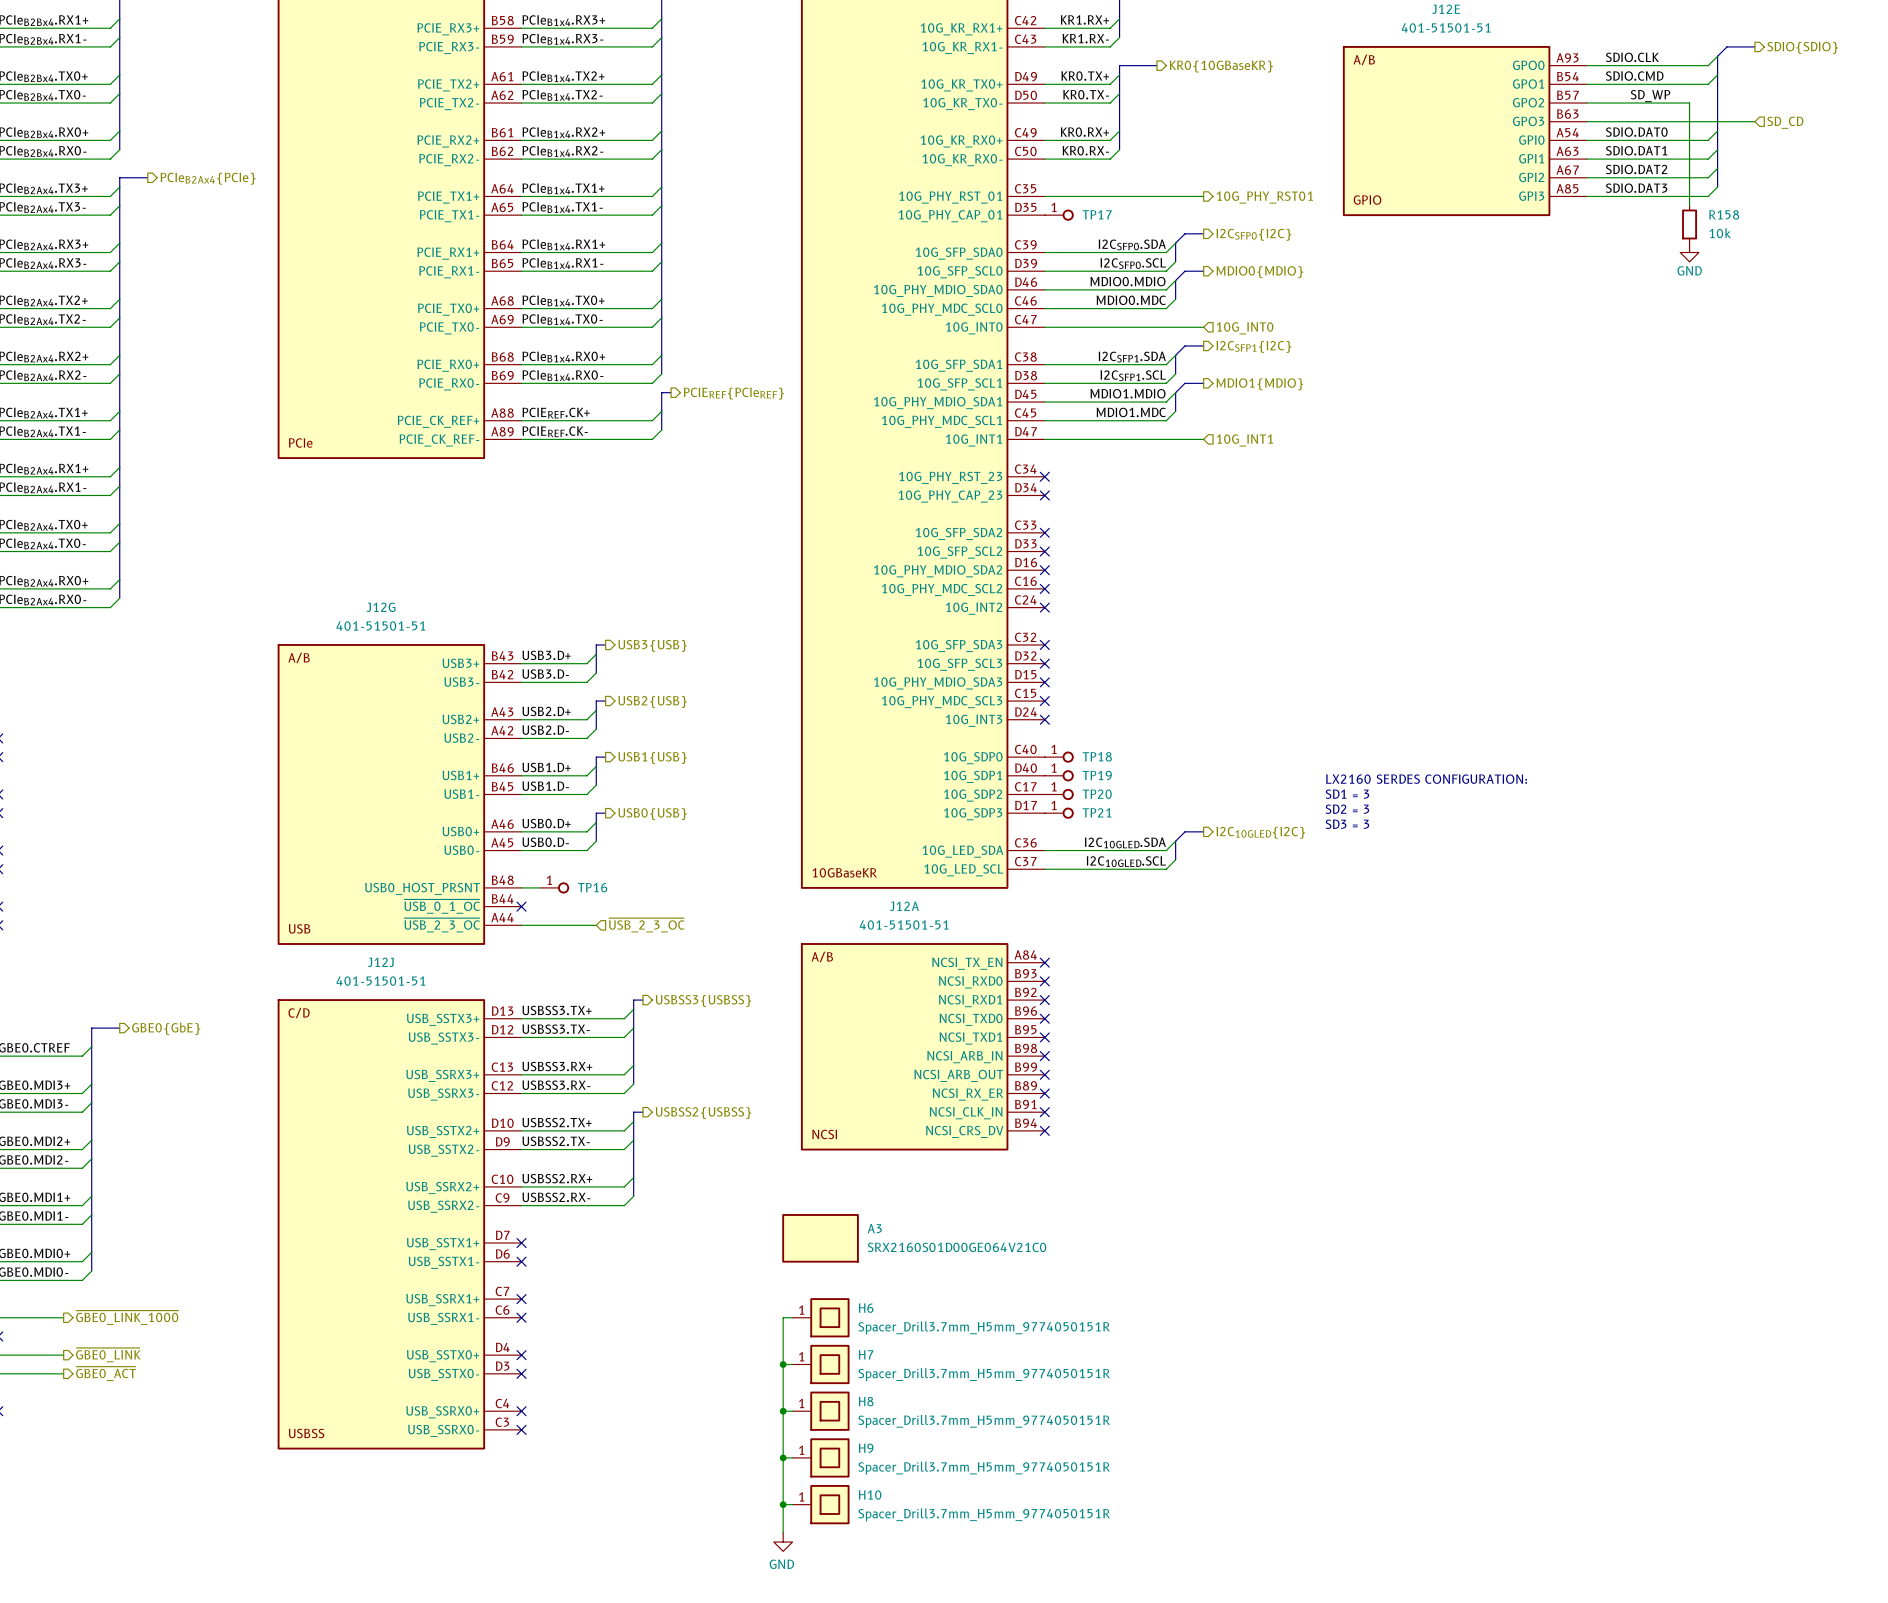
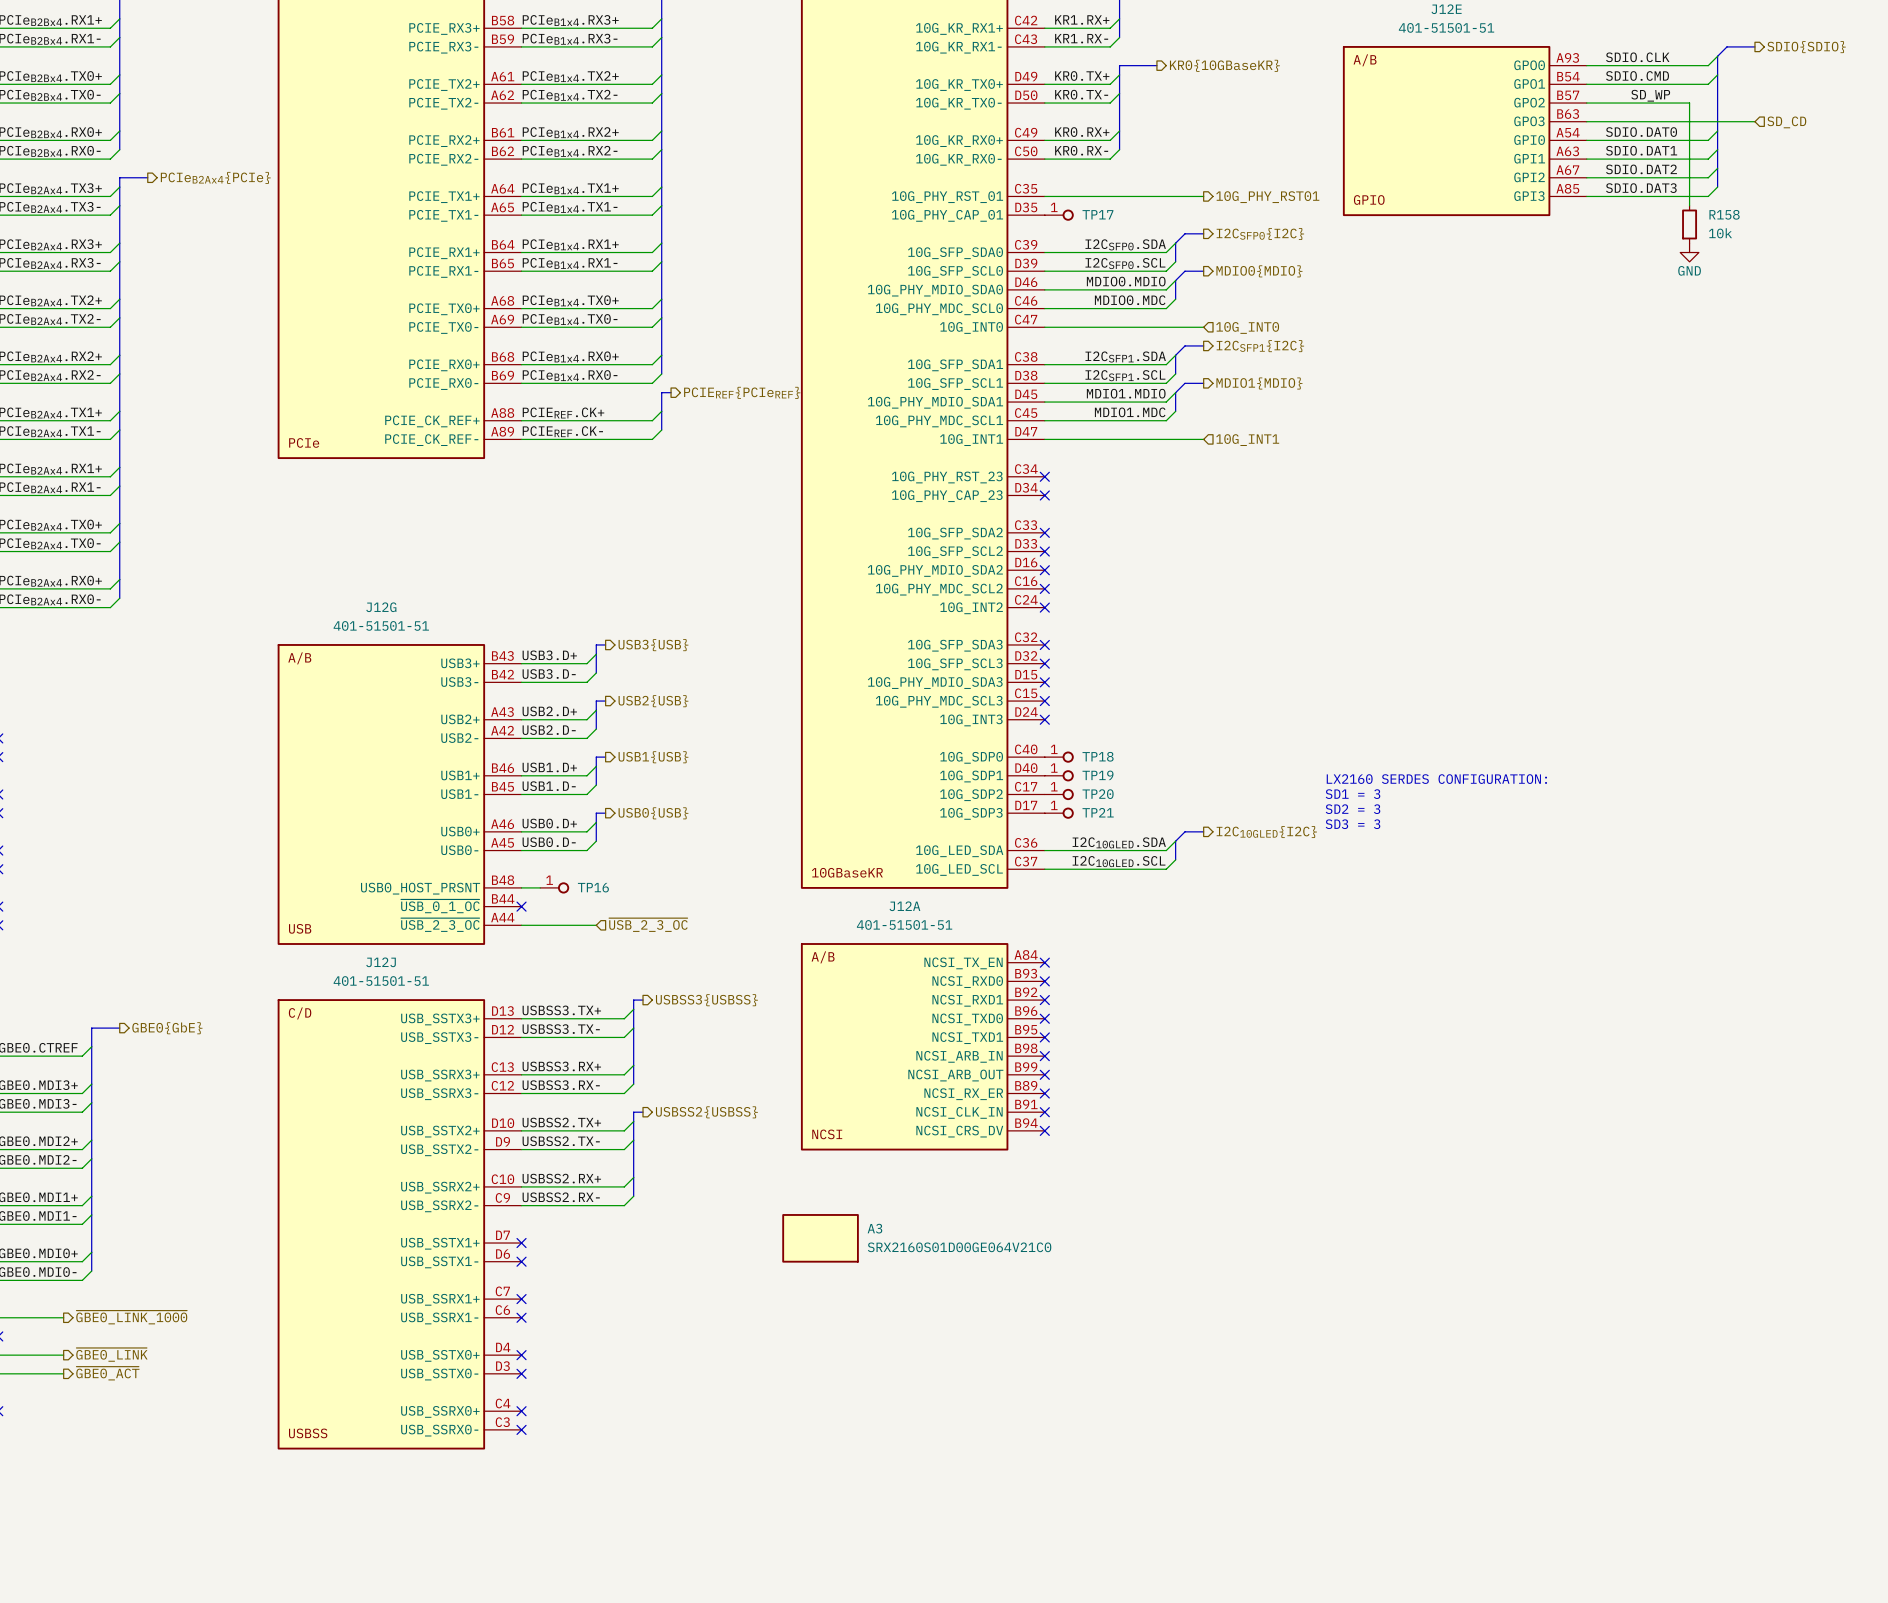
wire: (792, 1317) (783, 1317) (783, 1532) -> none
H6: Spacer_Drill3.7mm_H5mm_9774050151R (821, 1317) -> none
wire: (783, 1364) (792, 1364) -> none
junction: (783, 1364) -> none
H7: Spacer_Drill3.7mm_H5mm_9774050151R (821, 1364) -> none
wire: (783, 1411) (792, 1411) -> none
junction: (783, 1411) -> none
H8: Spacer_Drill3.7mm_H5mm_9774050151R (821, 1411) -> none
wire: (783, 1457) (792, 1457) -> none
junction: (783, 1457) -> none
H9: Spacer_Drill3.7mm_H5mm_9774050151R (821, 1457) -> none
wire: (783, 1504) (792, 1504) -> none
junction: (783, 1504) -> none
H10: Spacer_Drill3.7mm_H5mm_9774050151R (821, 1504) -> none
power symbol: GND (783, 1542) -> none

